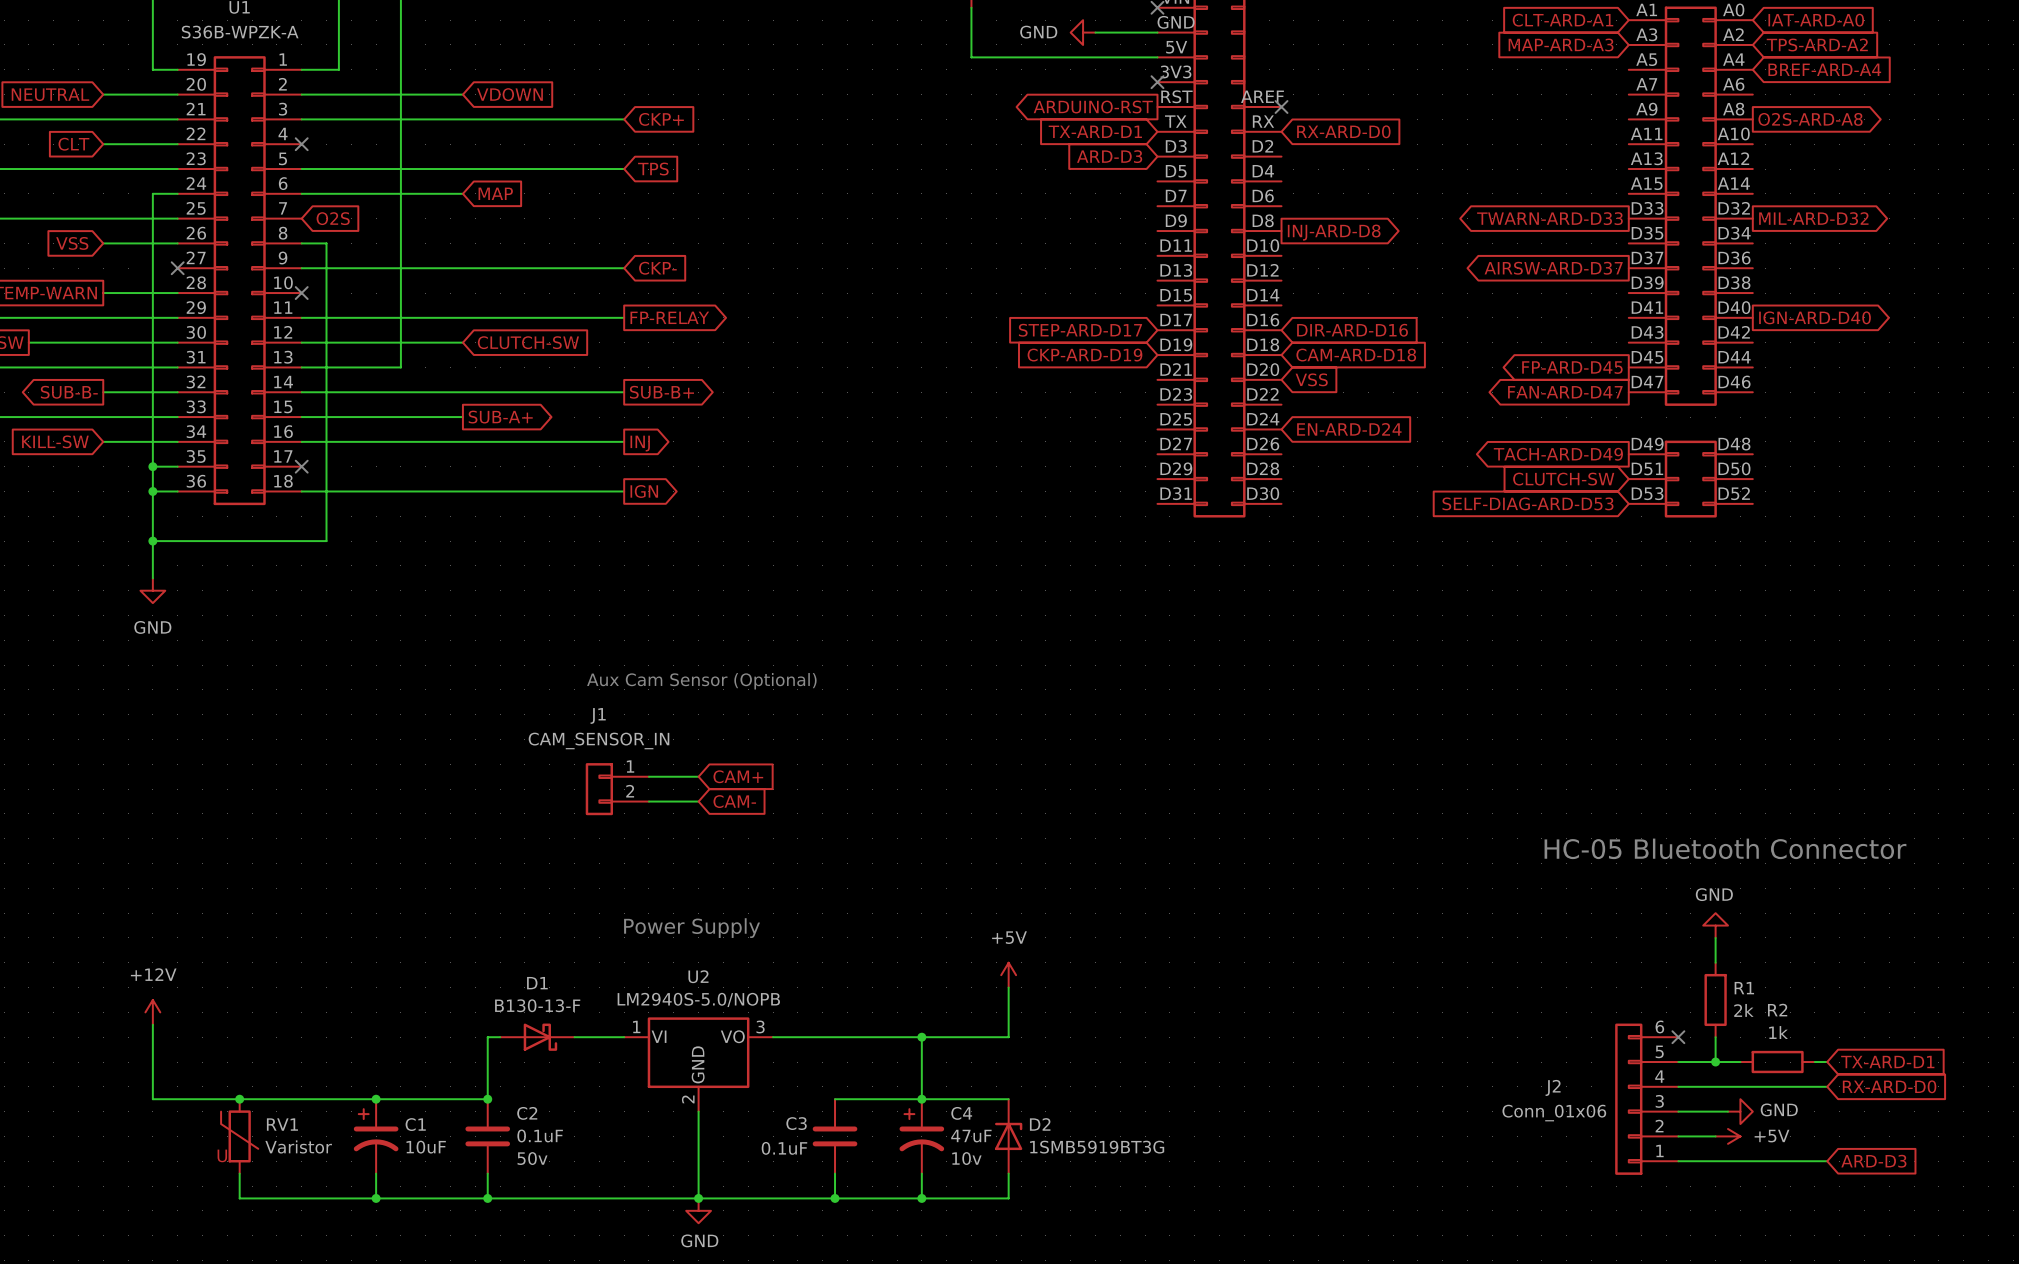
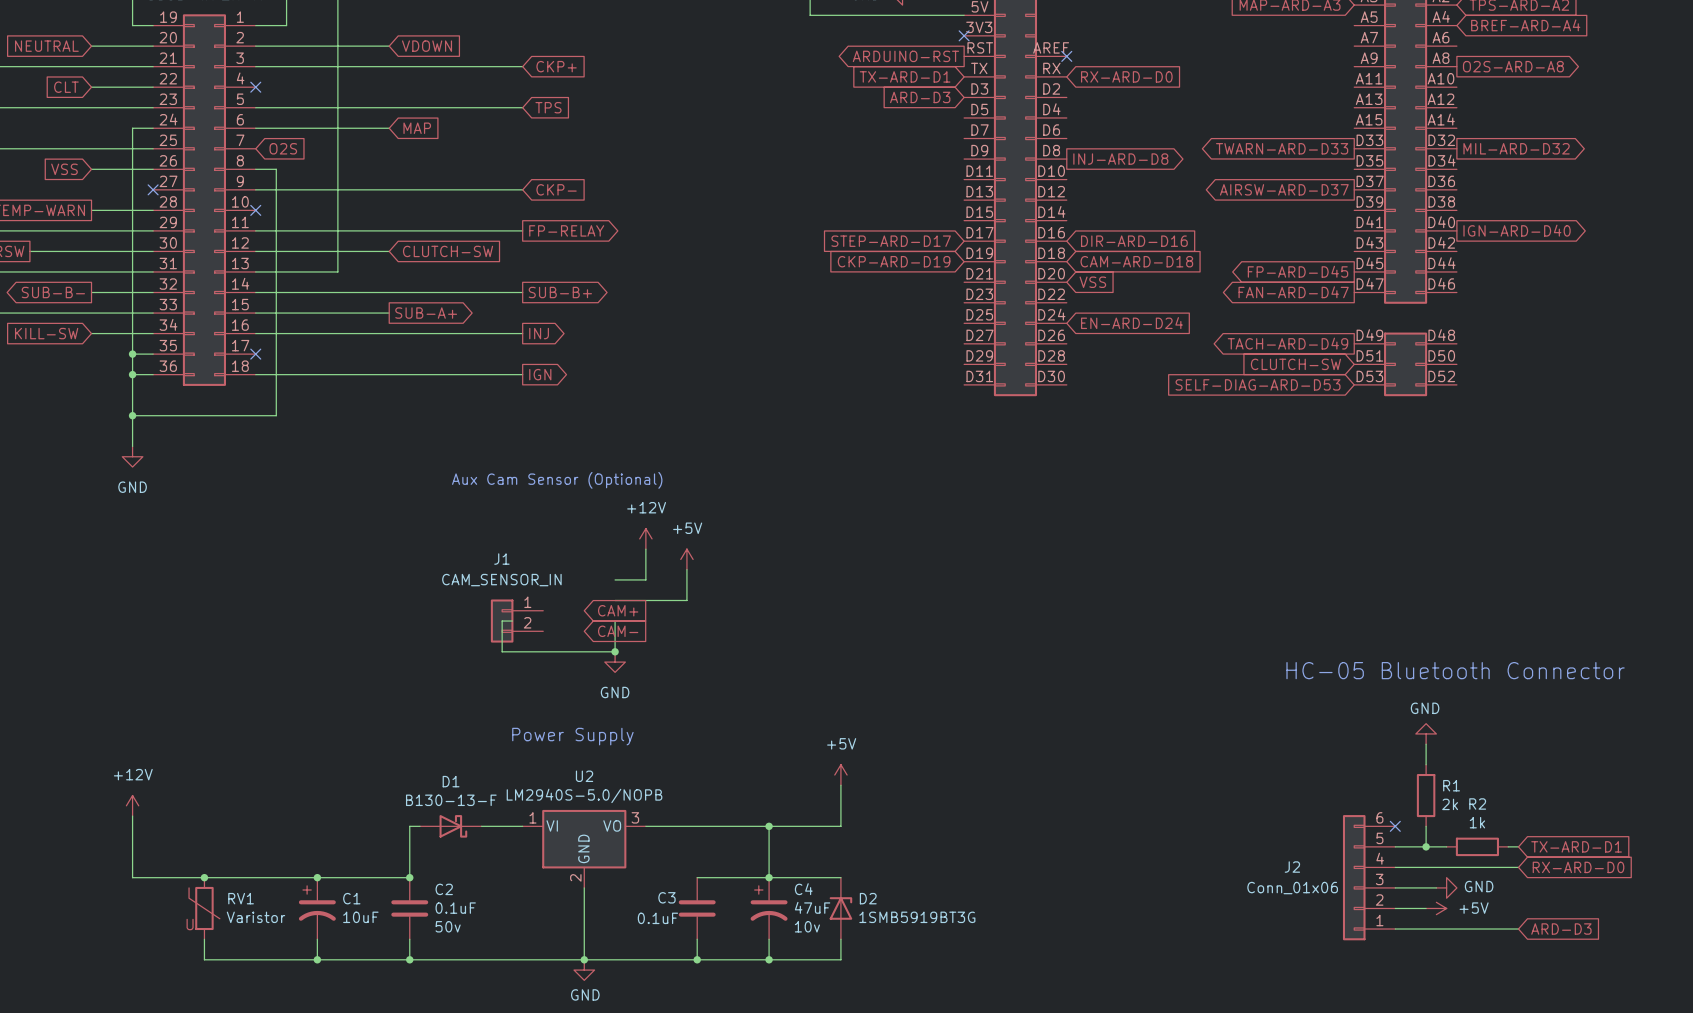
text position: Aux Cam Sensor (Optional) (701, 681) -> Aux Cam Sensor (Optional) (557, 480)
power symbol: none -> +12V (645, 538)
wire: none -> (645, 549) (645, 579) (615, 579)
power symbol: none -> +5V (686, 559)
wire: none -> (686, 569) (686, 600) (615, 600)
wire: (648, 776) (698, 776) -> none
wire: none -> (512, 621) (502, 621) (502, 651) (615, 651) (615, 621)
wire: (648, 801) (698, 801) -> none
junction: none -> (615, 651)
power symbol: none -> GND (615, 662)

